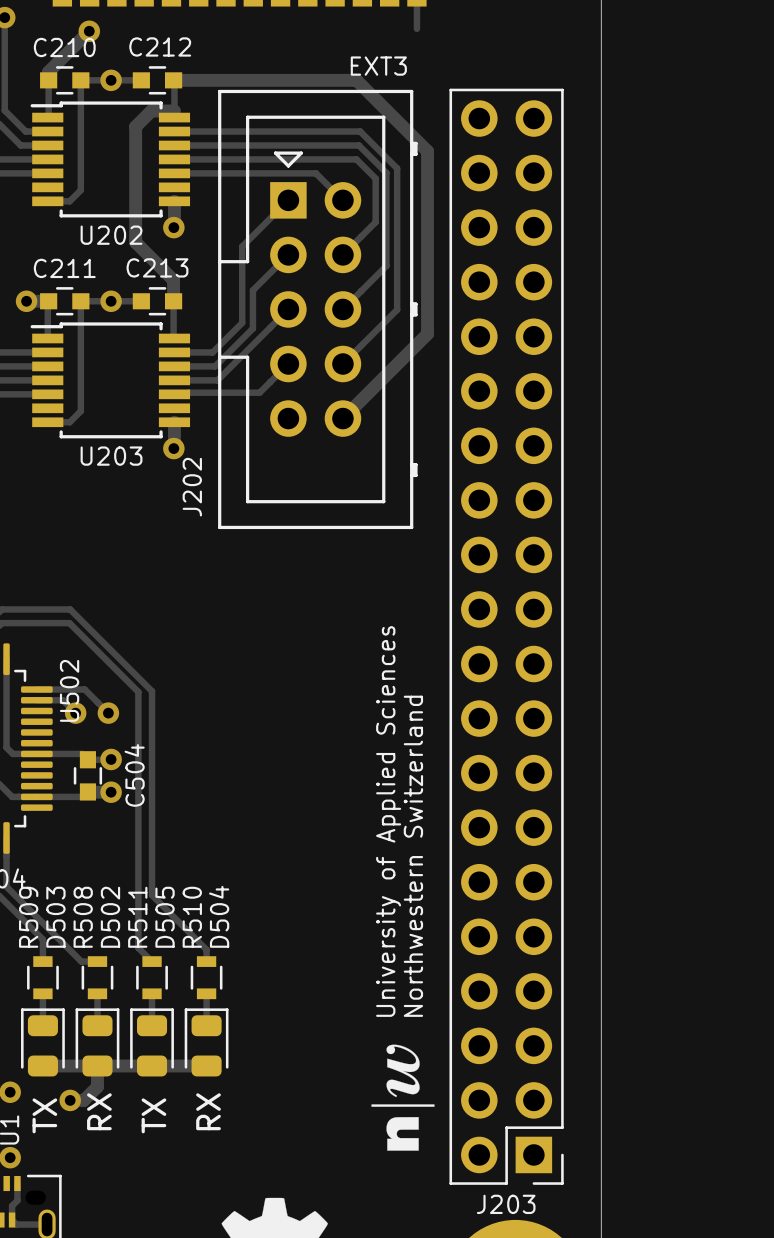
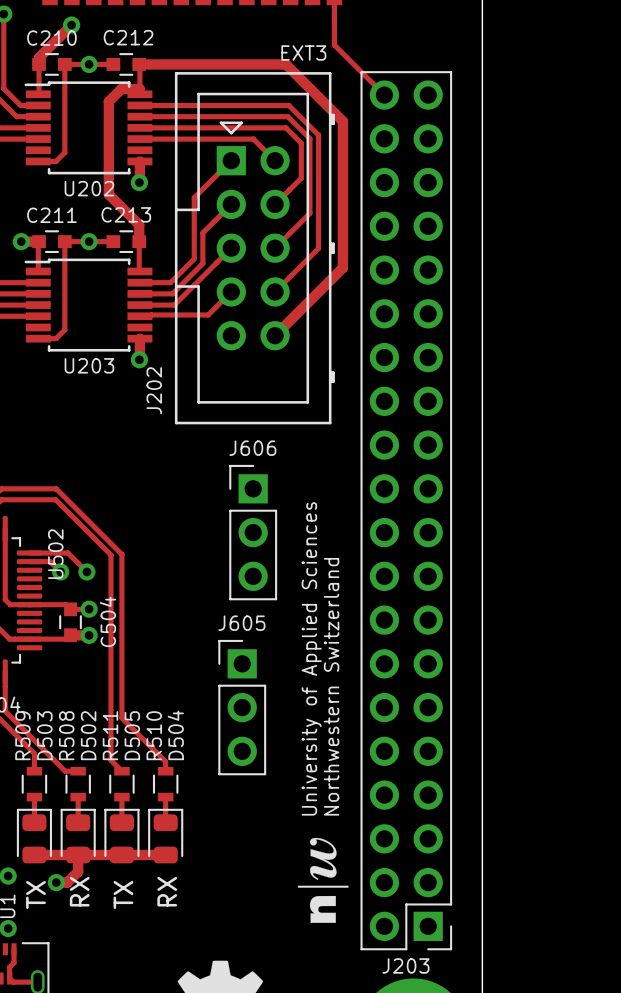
track: none -> (334, 23) (334, 45) (384, 95)
J606: none -> (253, 532)
J605: none -> (242, 707)

